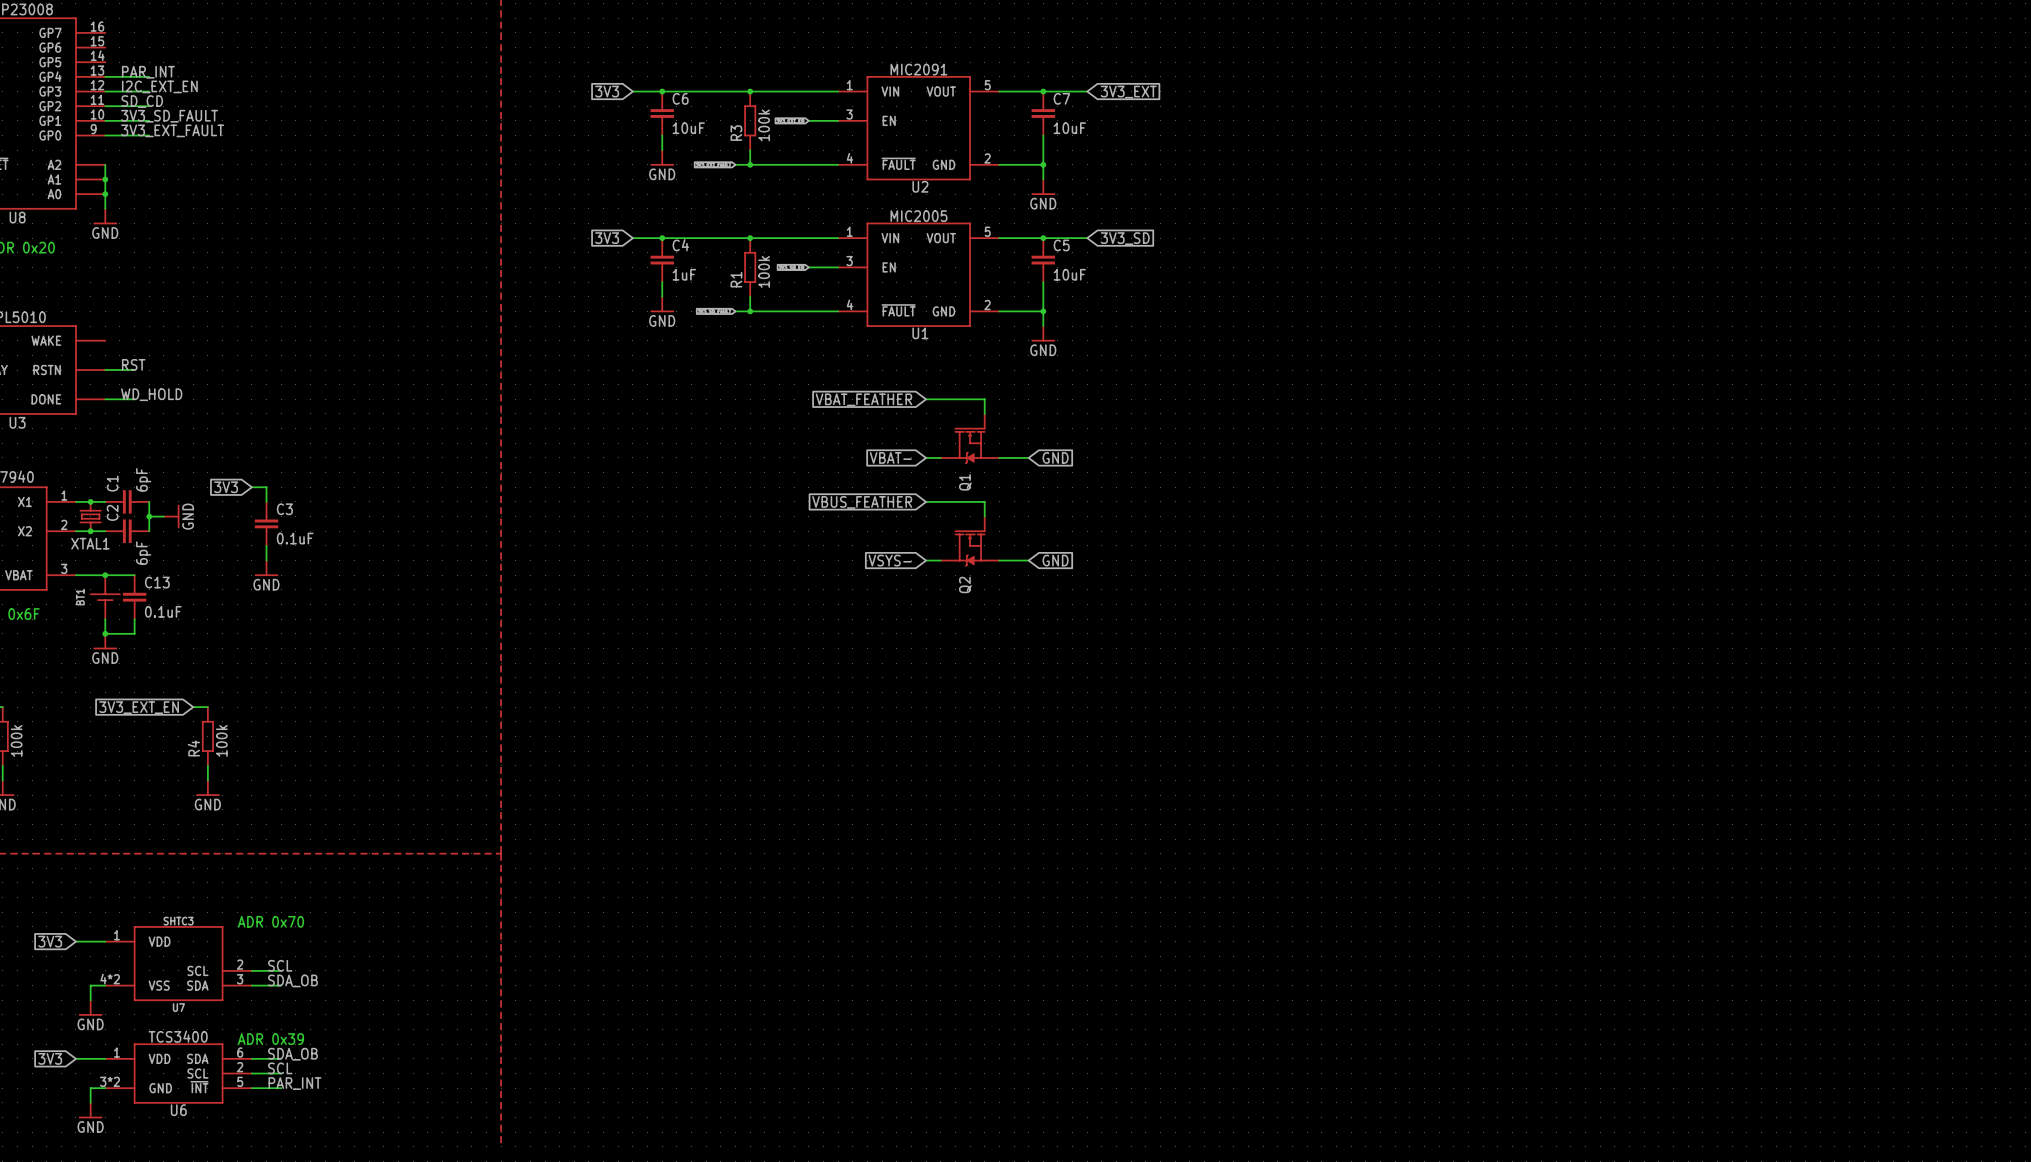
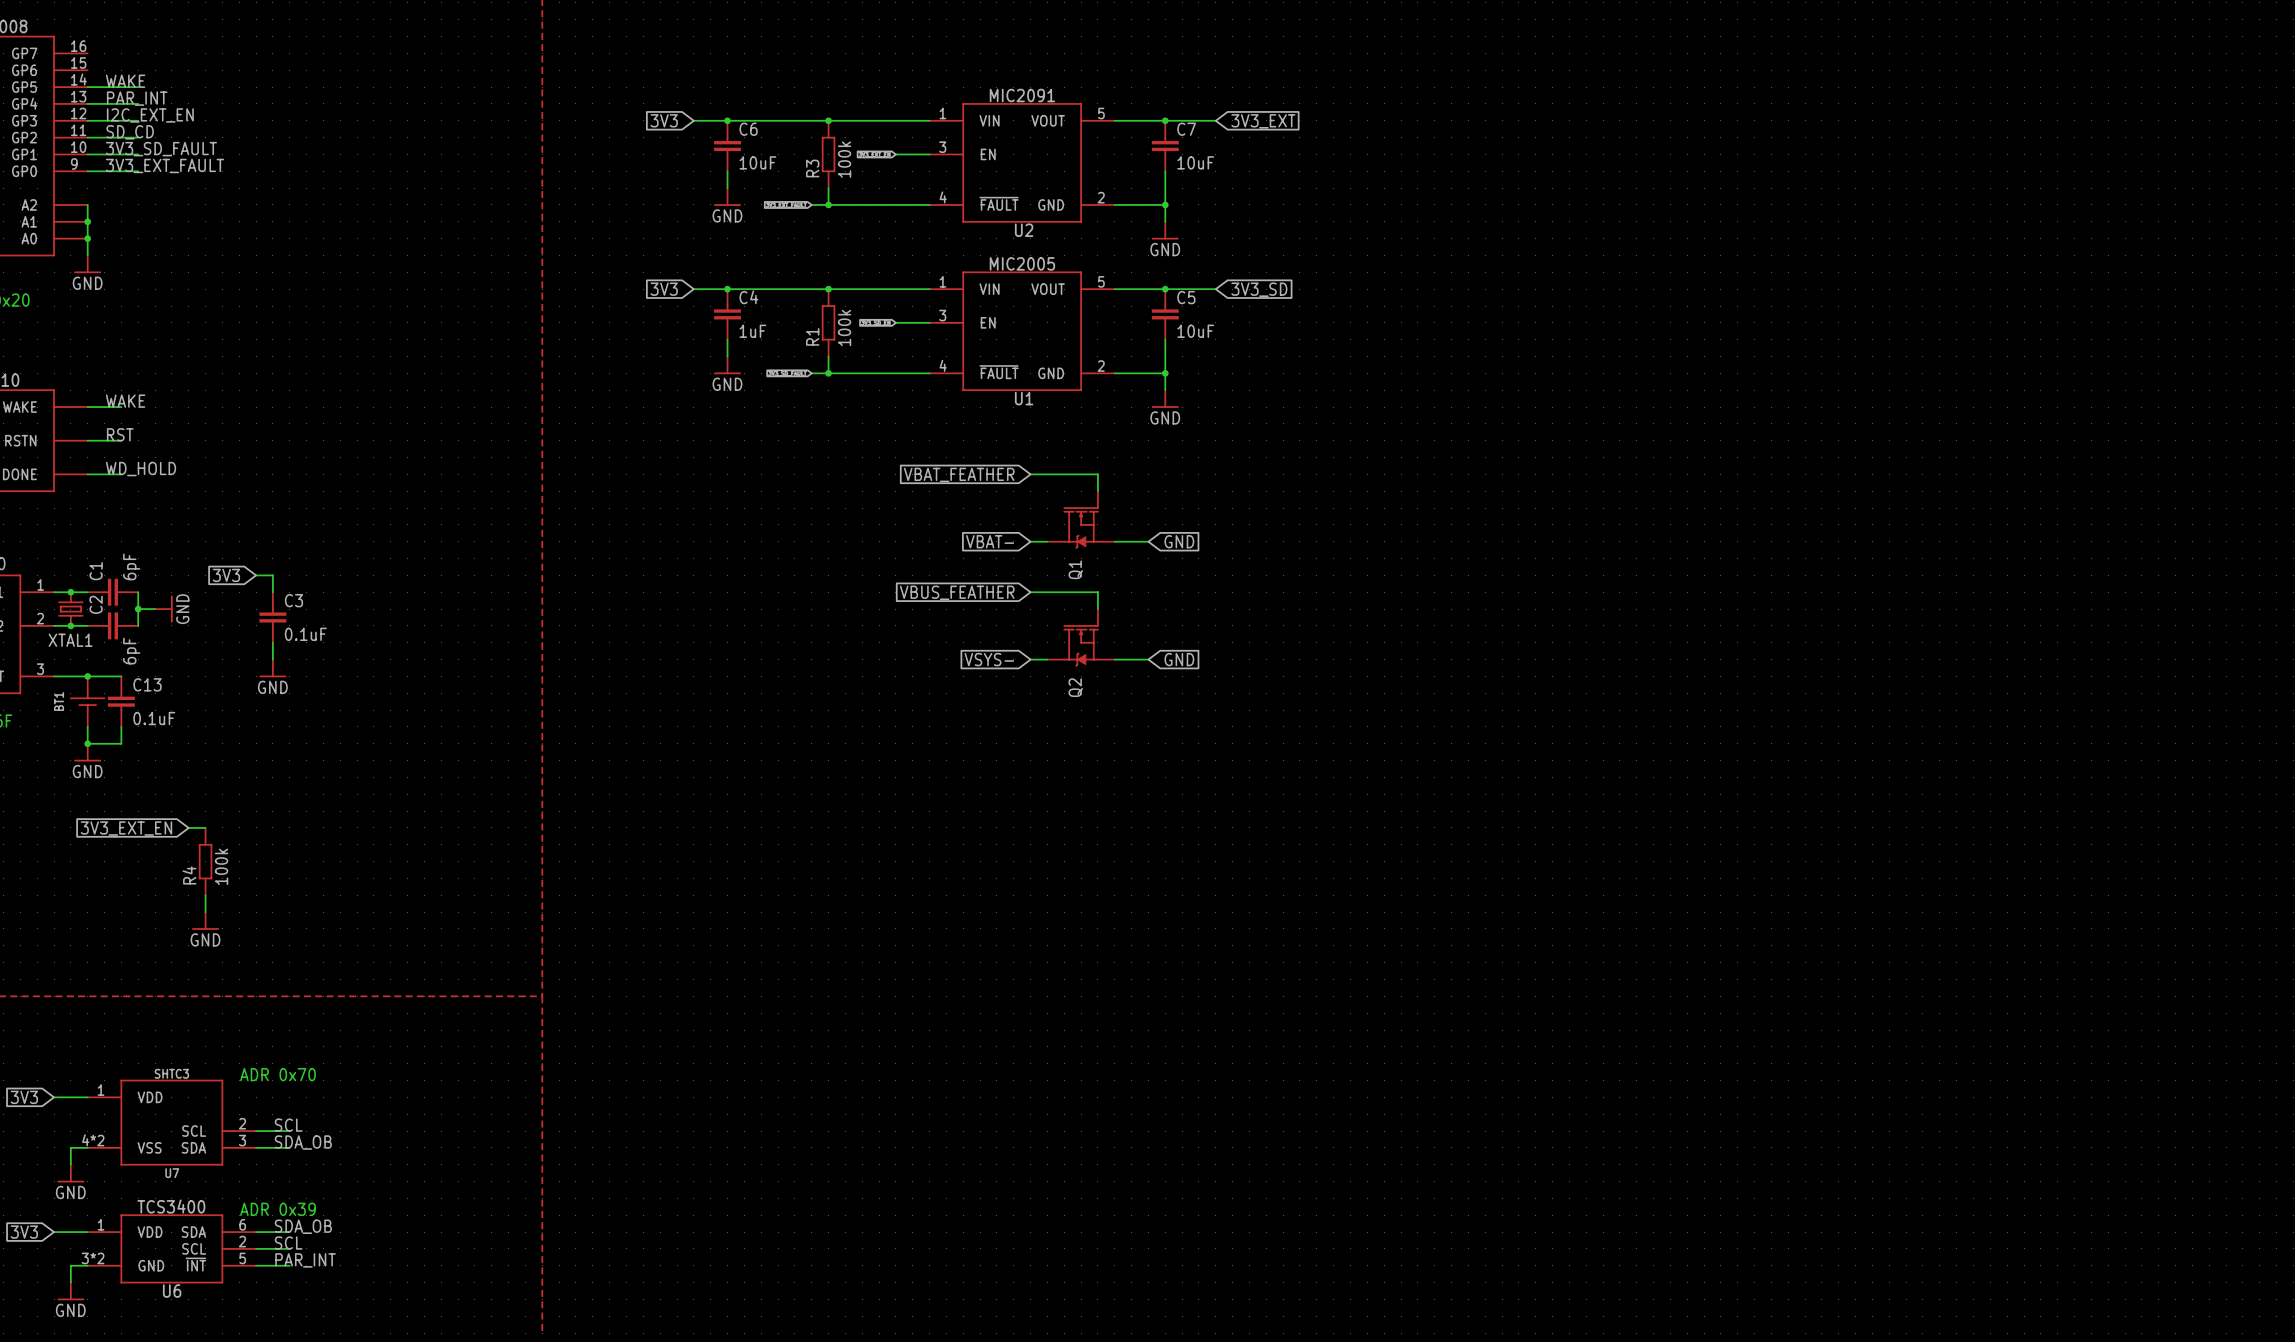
label: none -> WAKE (125, 81)
wire: none -> (87, 87) (138, 87)
label: none -> WAKE (125, 401)
wire: none -> (87, 407) (121, 407)

